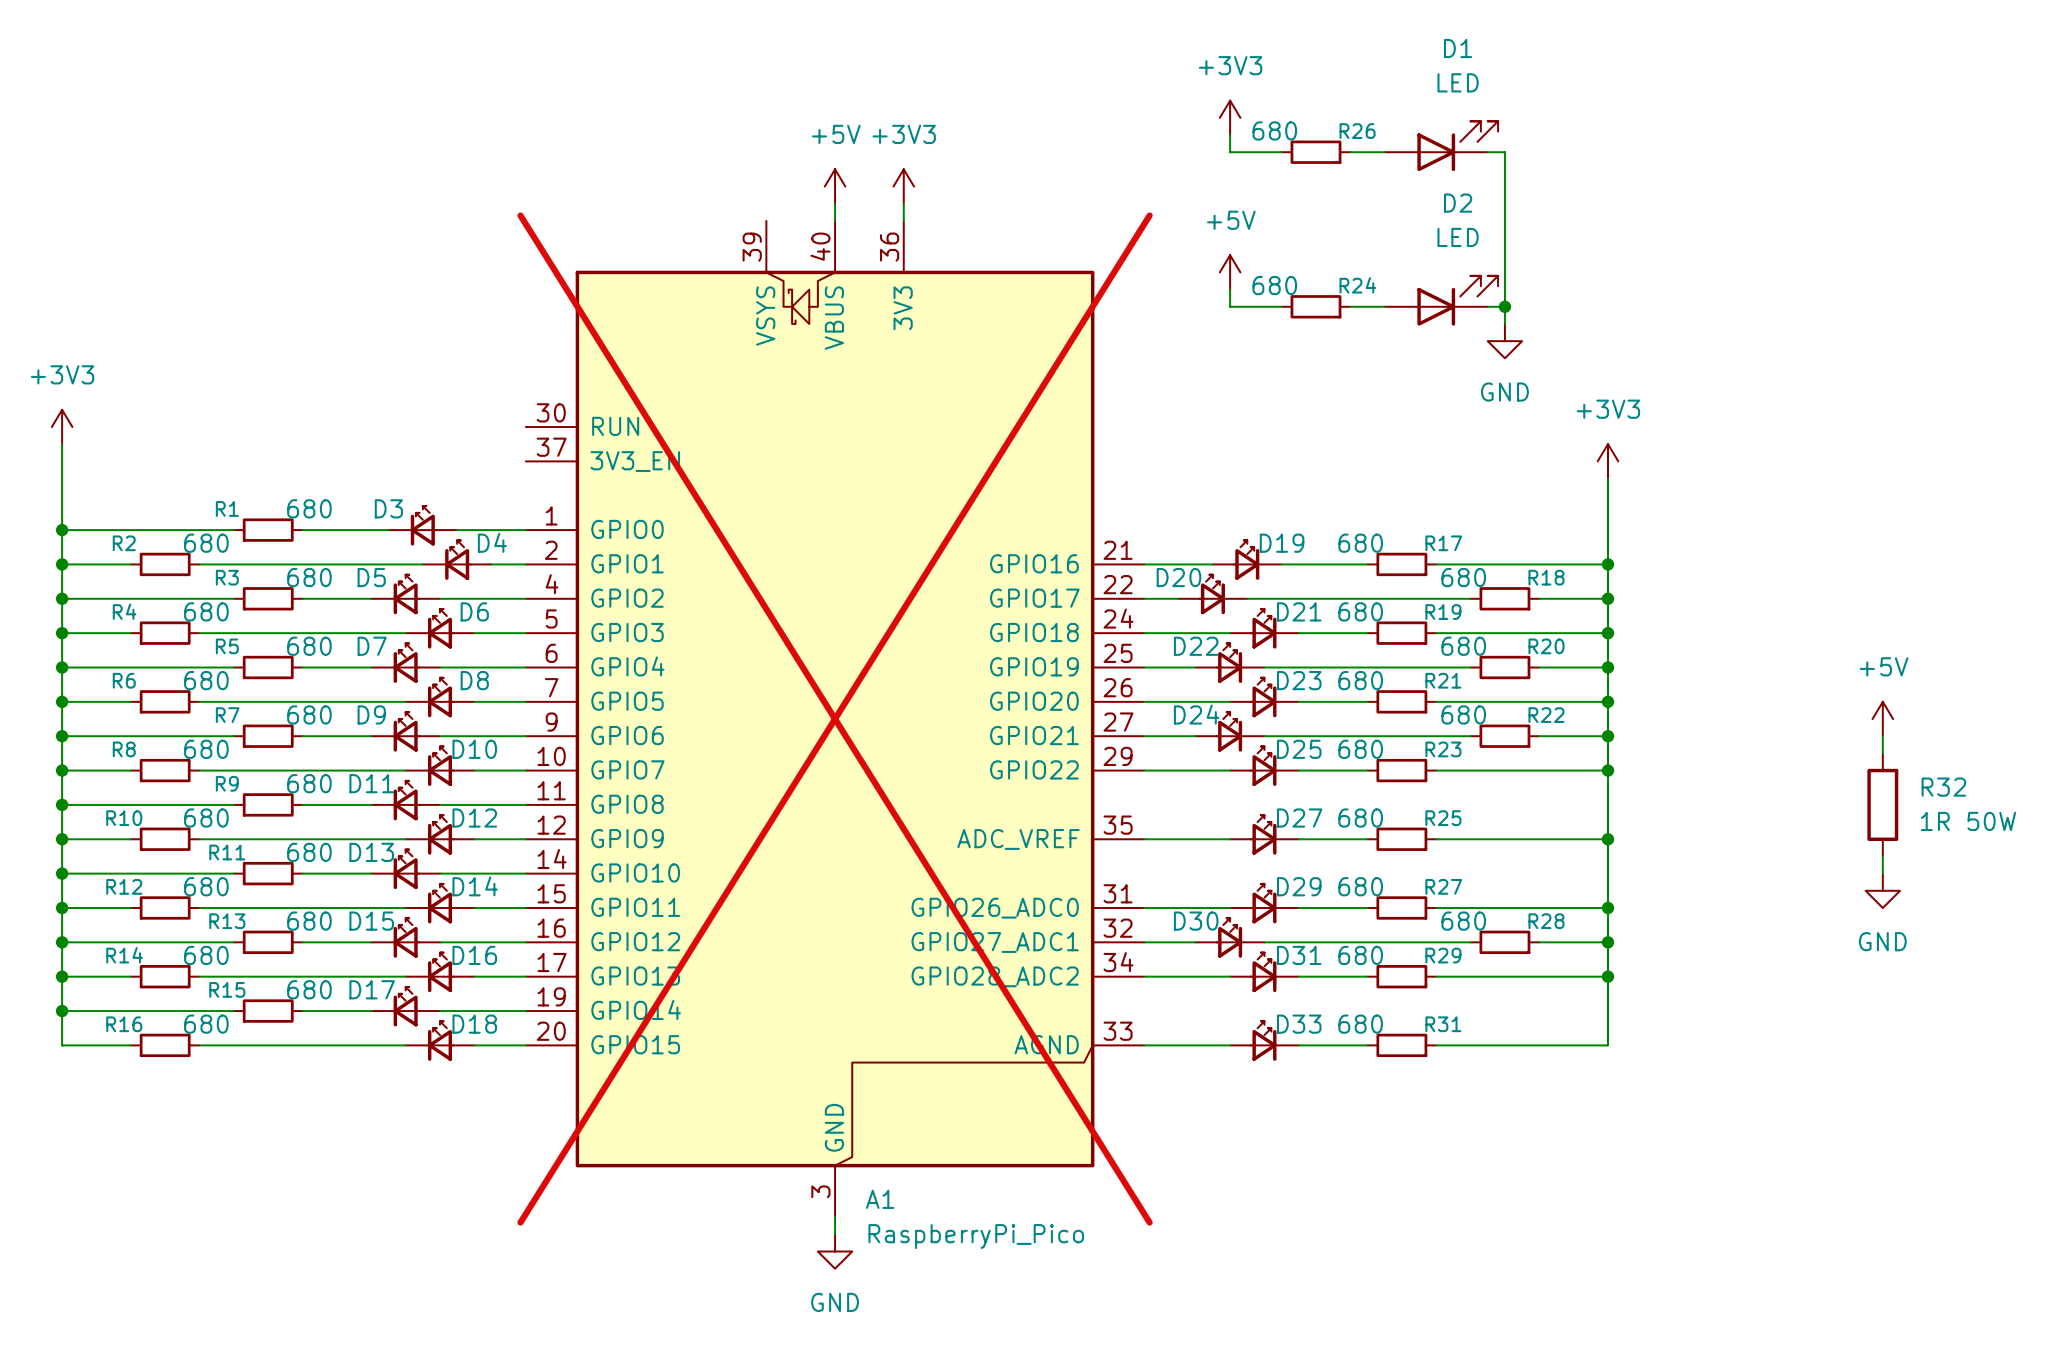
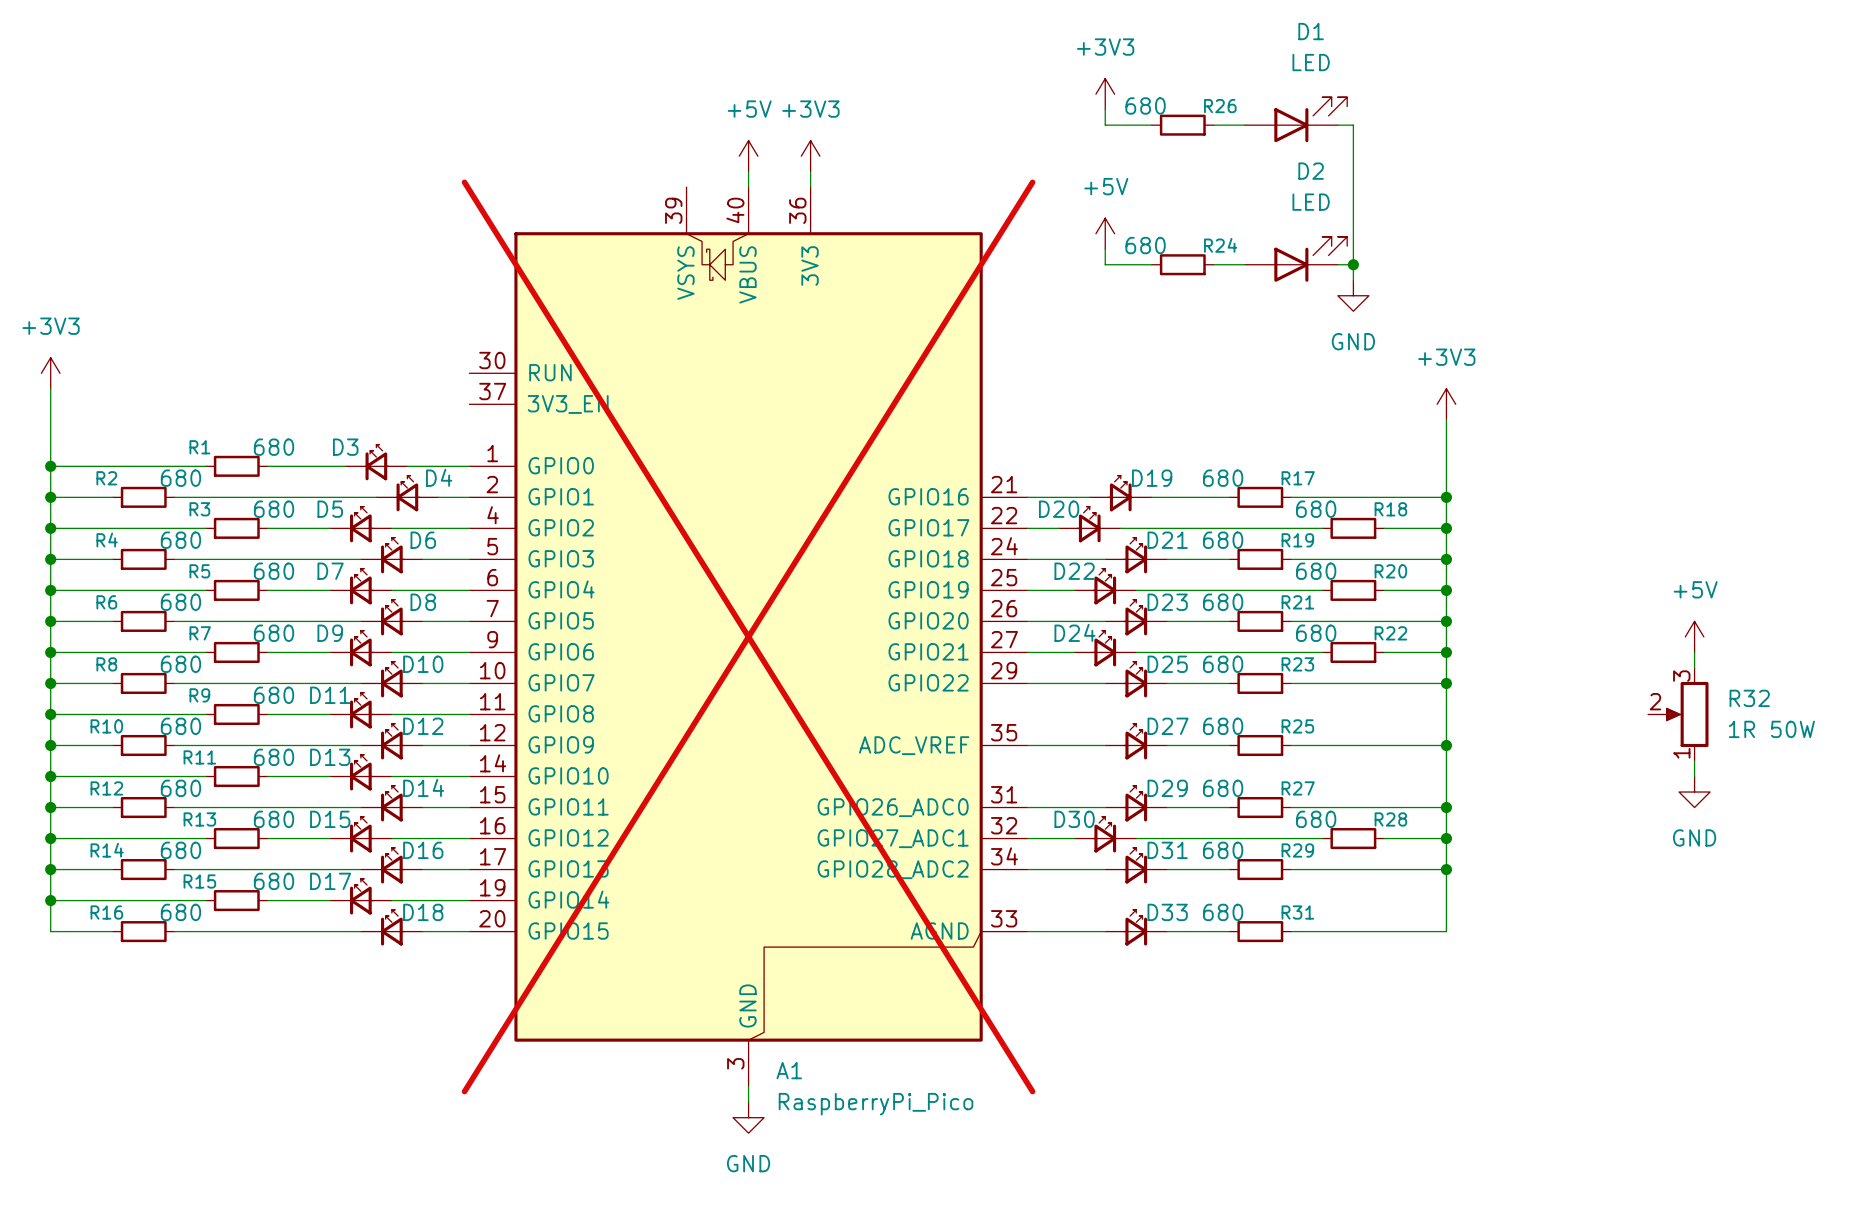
R32 symbol: [1867, 753, 1899, 857] -> [1648, 667, 1709, 762]

